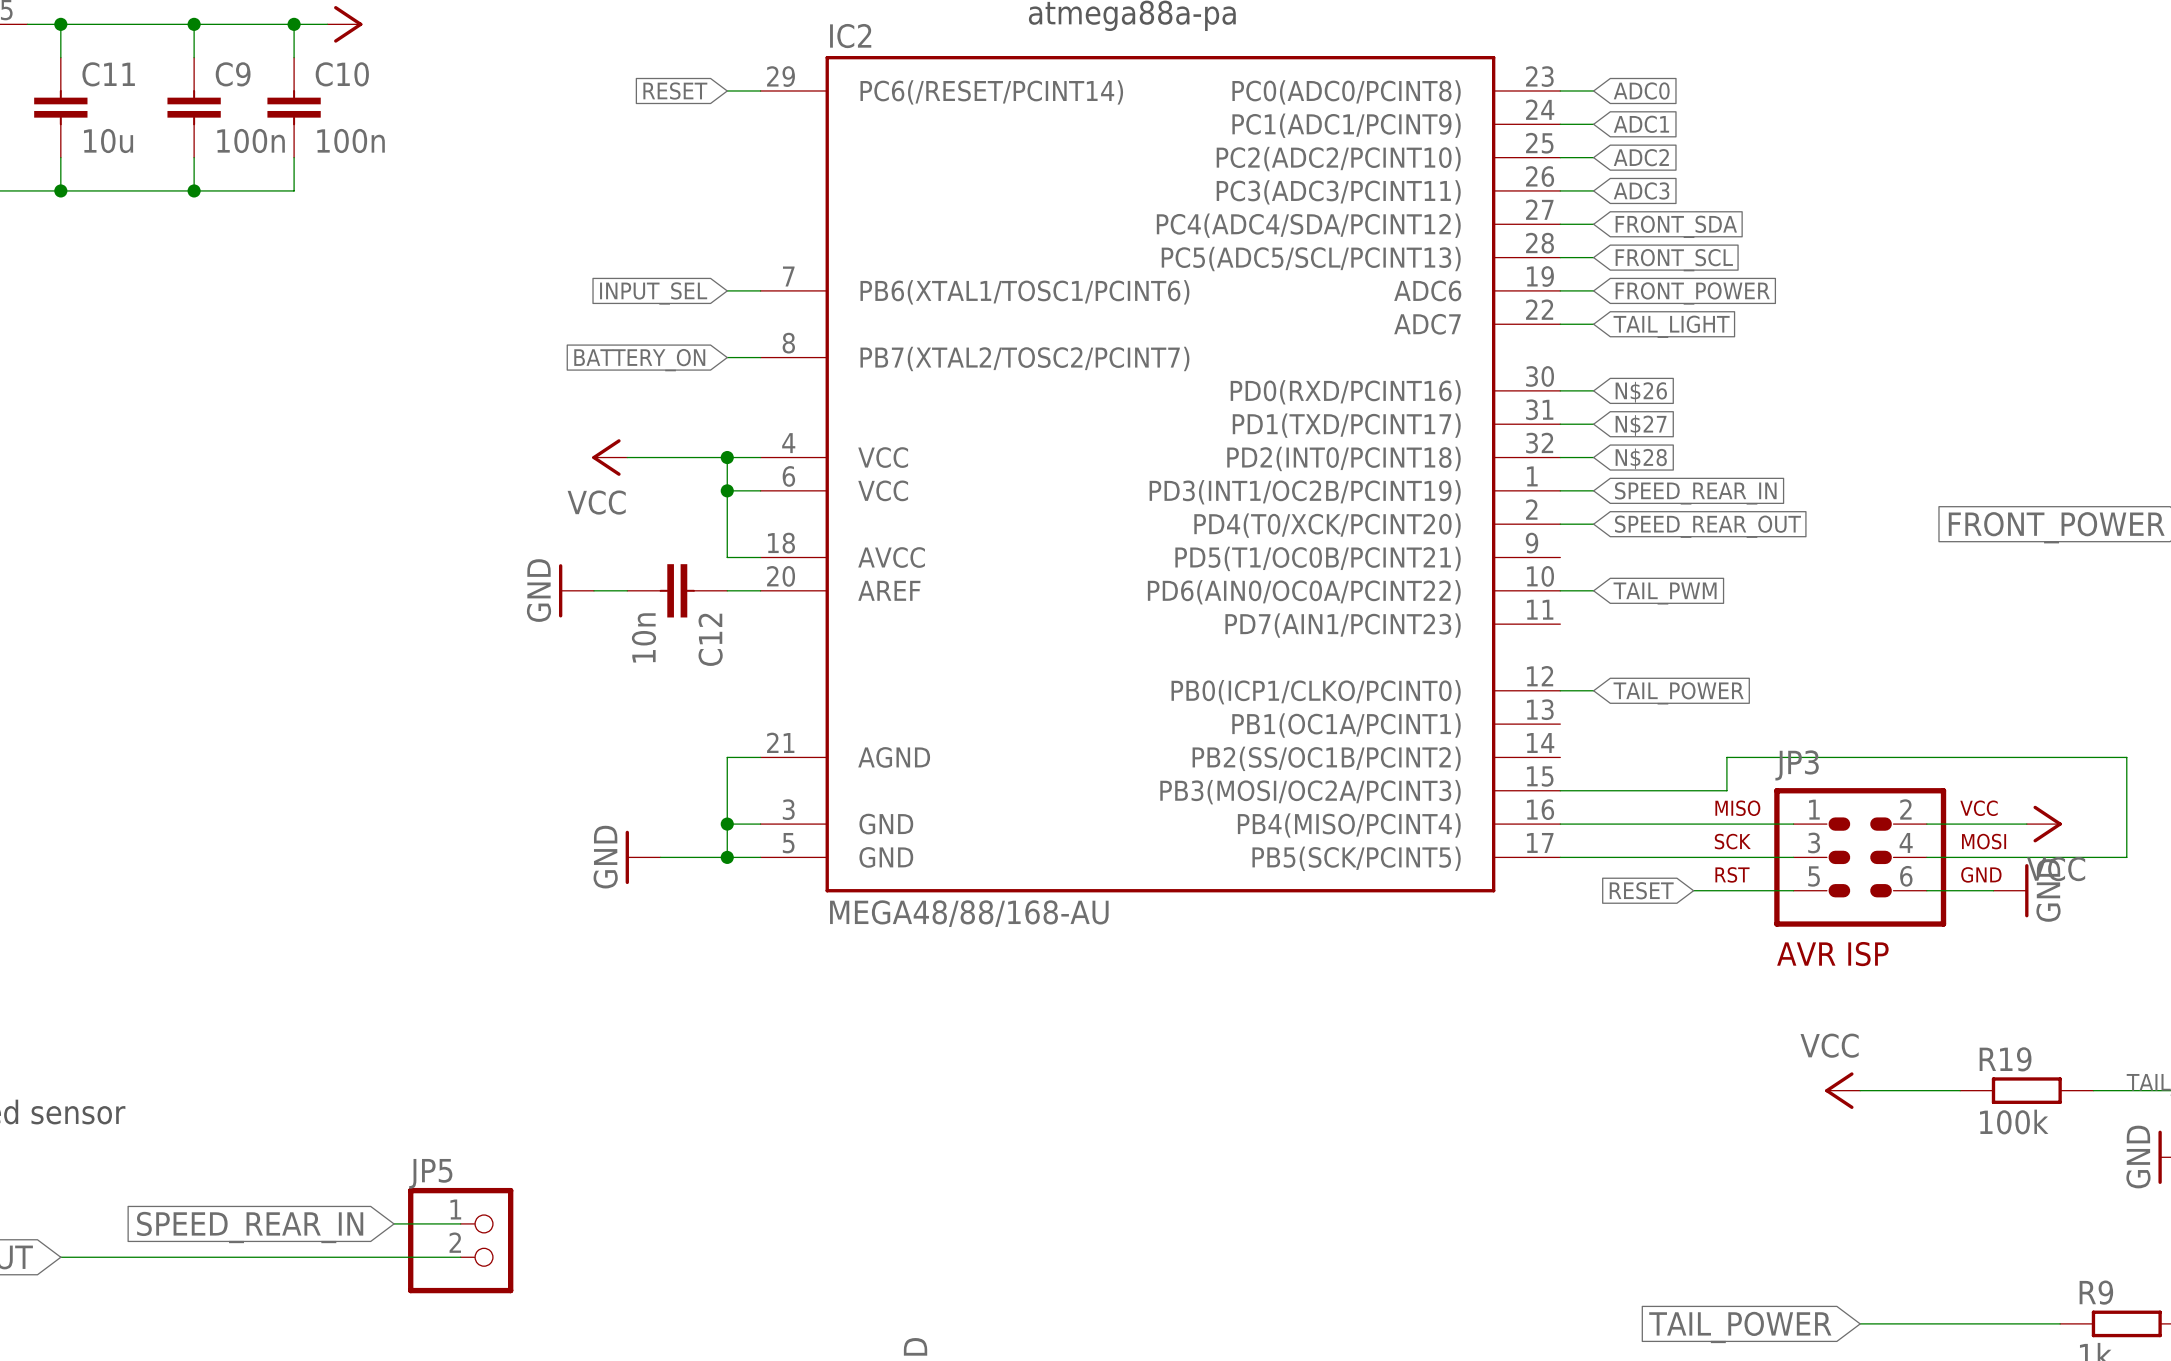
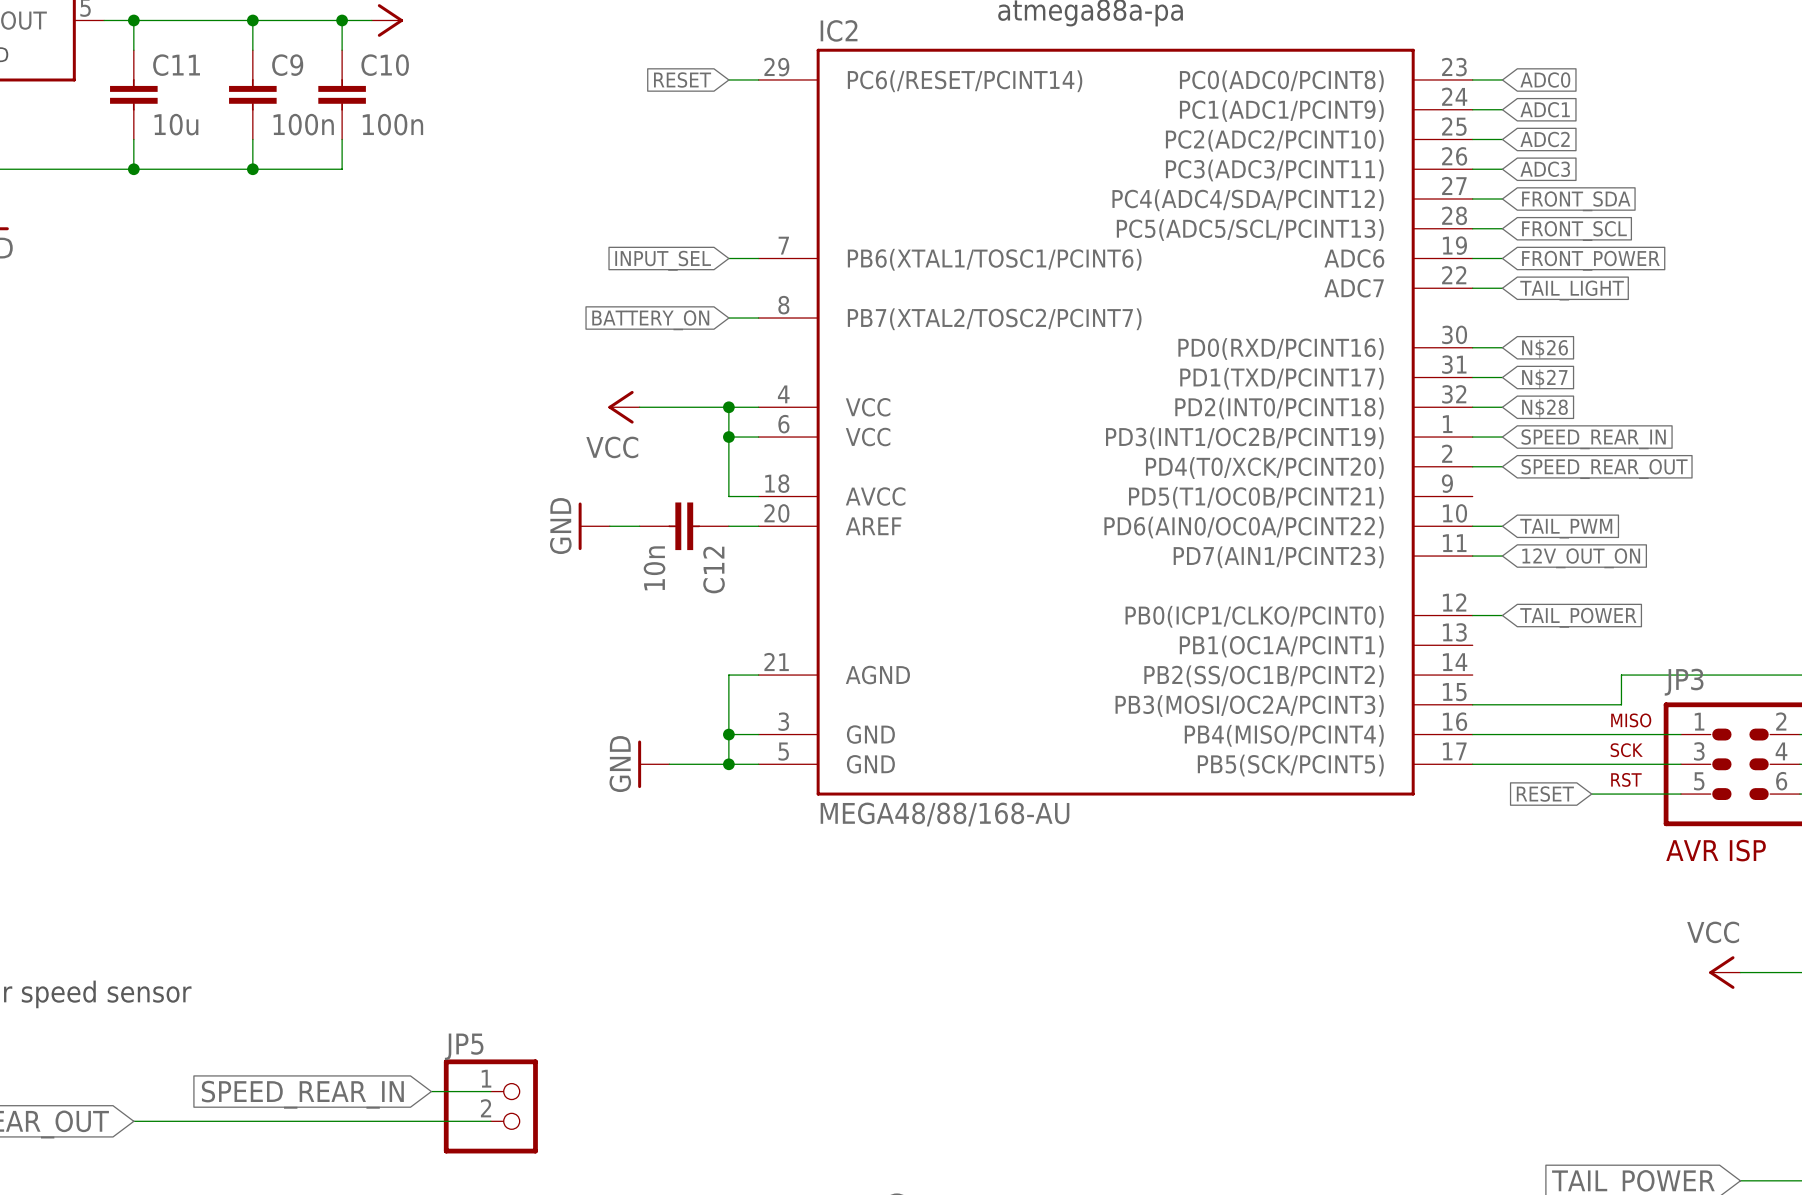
wire: none -> (1472, 556) (1502, 556)
global label: none -> 12V_OUT_ON (1581, 558)

